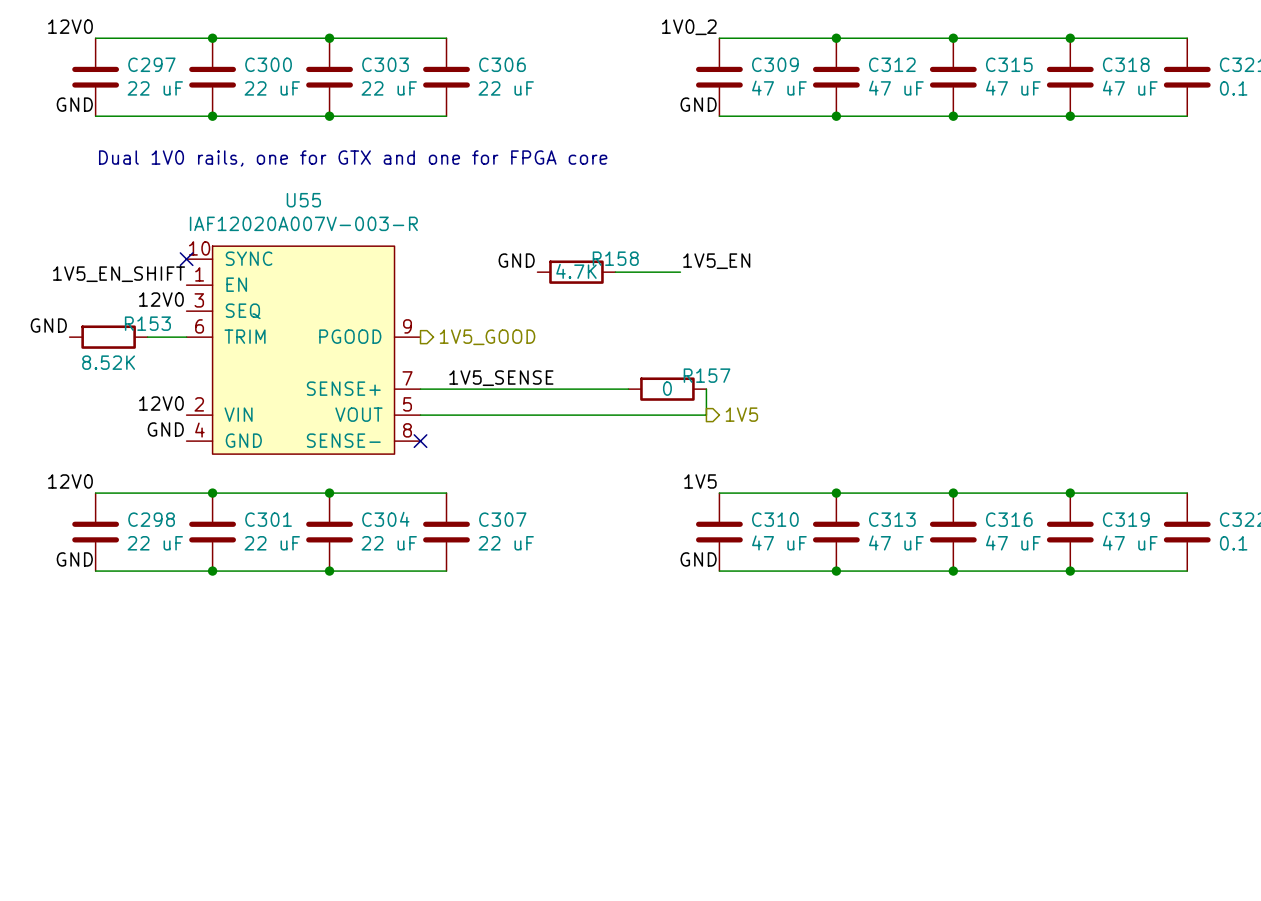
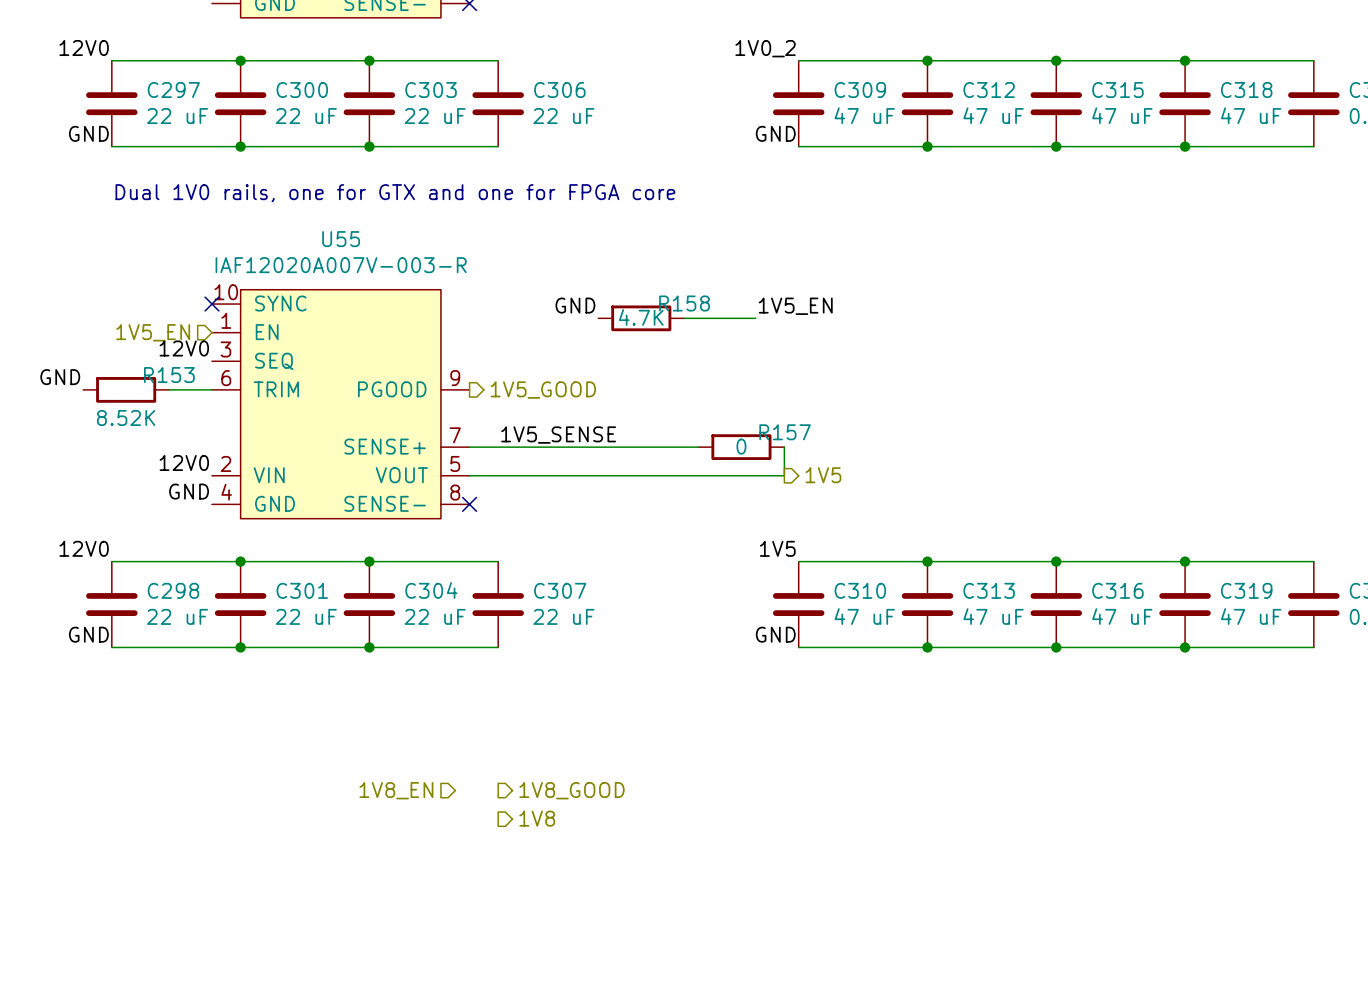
label: 1V5_EN_SHIFT (119, 274) -> none
hierarchical label: none -> 1V5_EN (153, 332)
hierarchical label: none -> 1V8_EN (396, 790)
hierarchical label: none -> 1V8_GOOD (572, 790)
hierarchical label: none -> 1V8 (537, 818)

